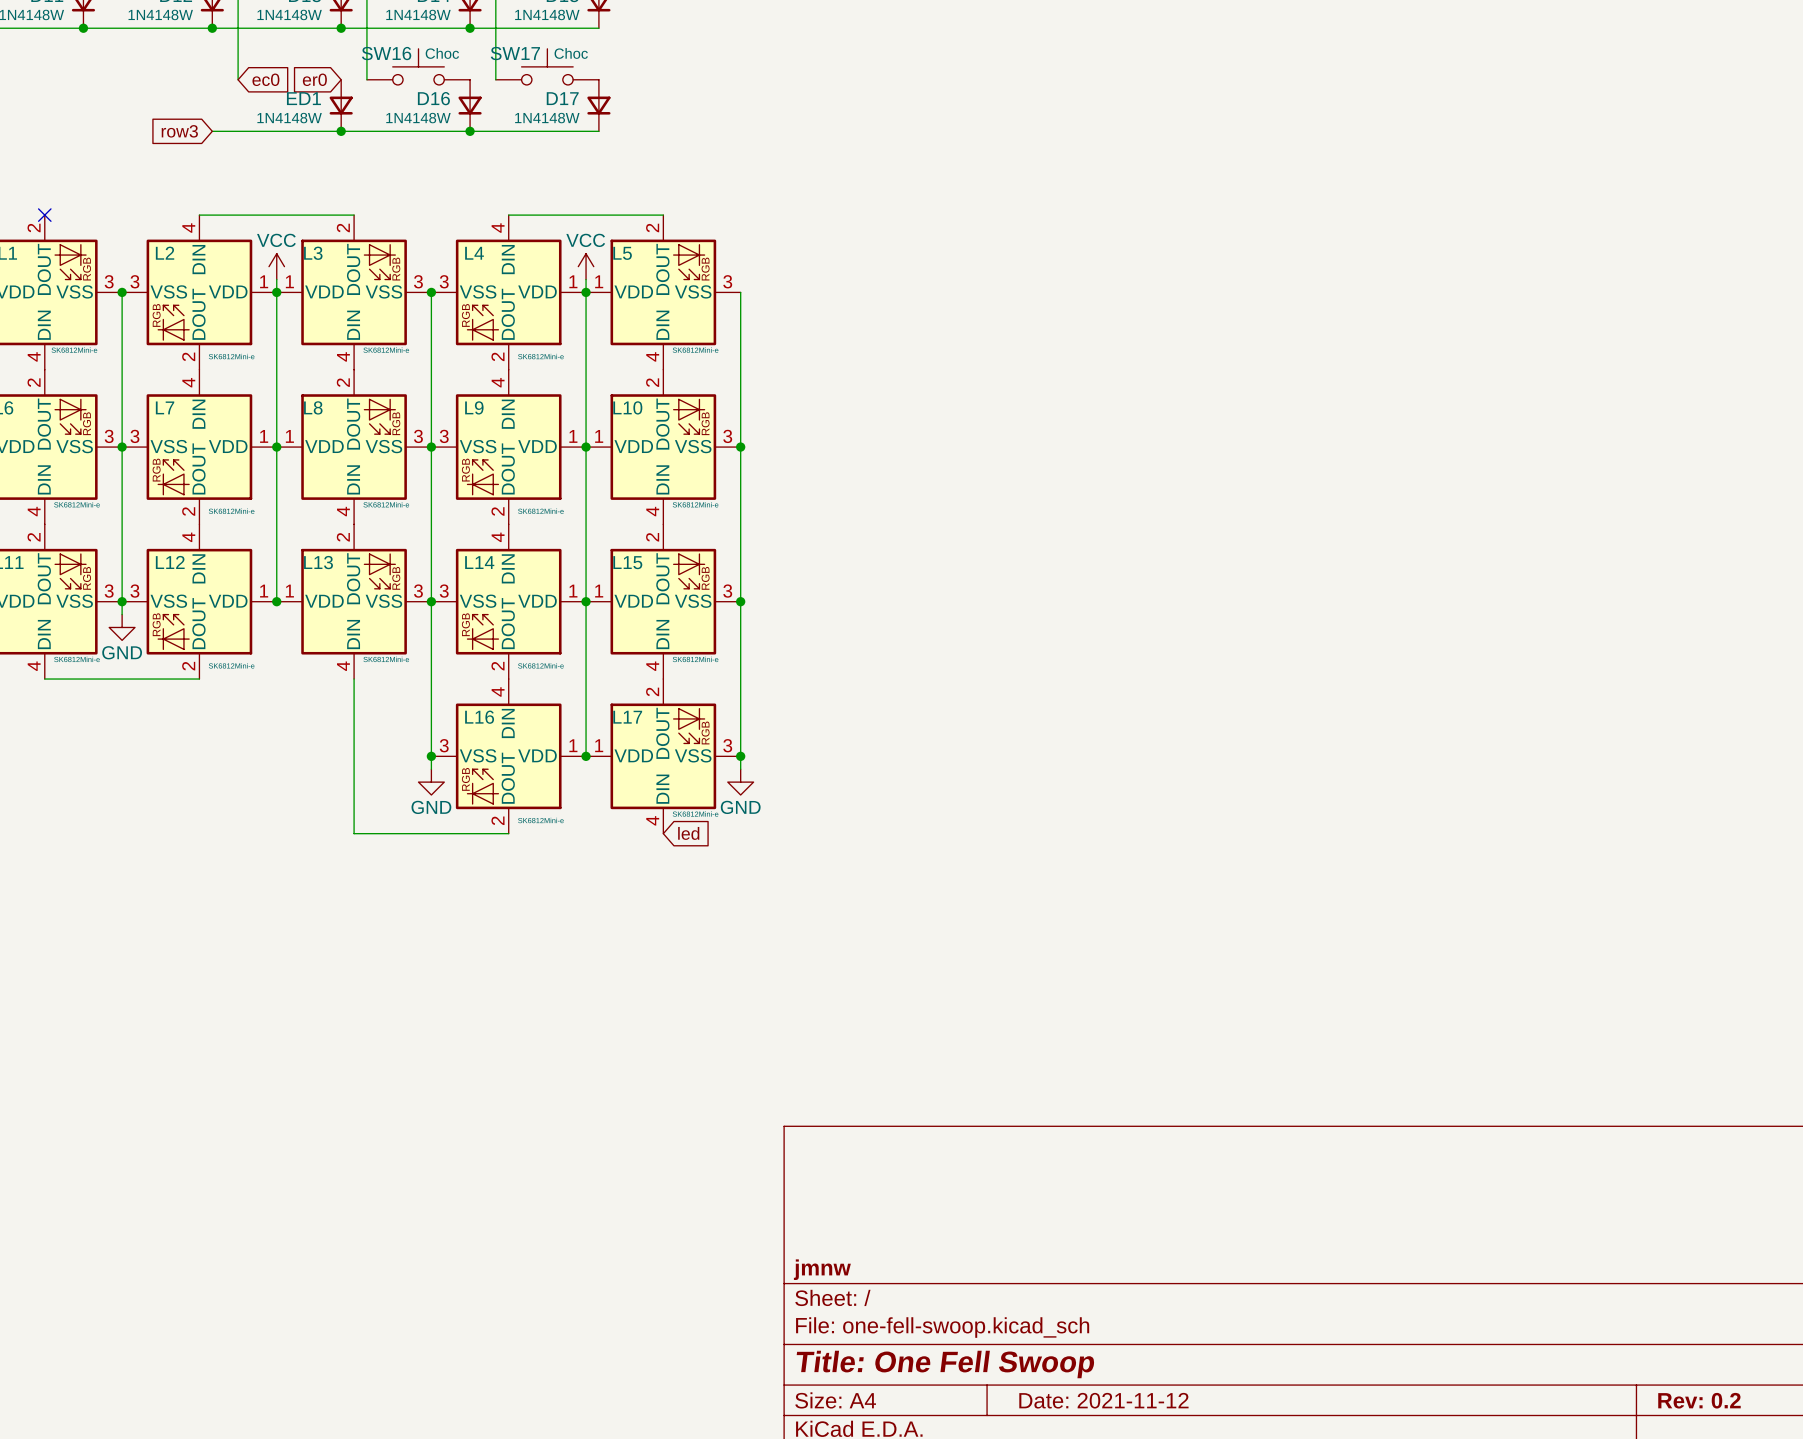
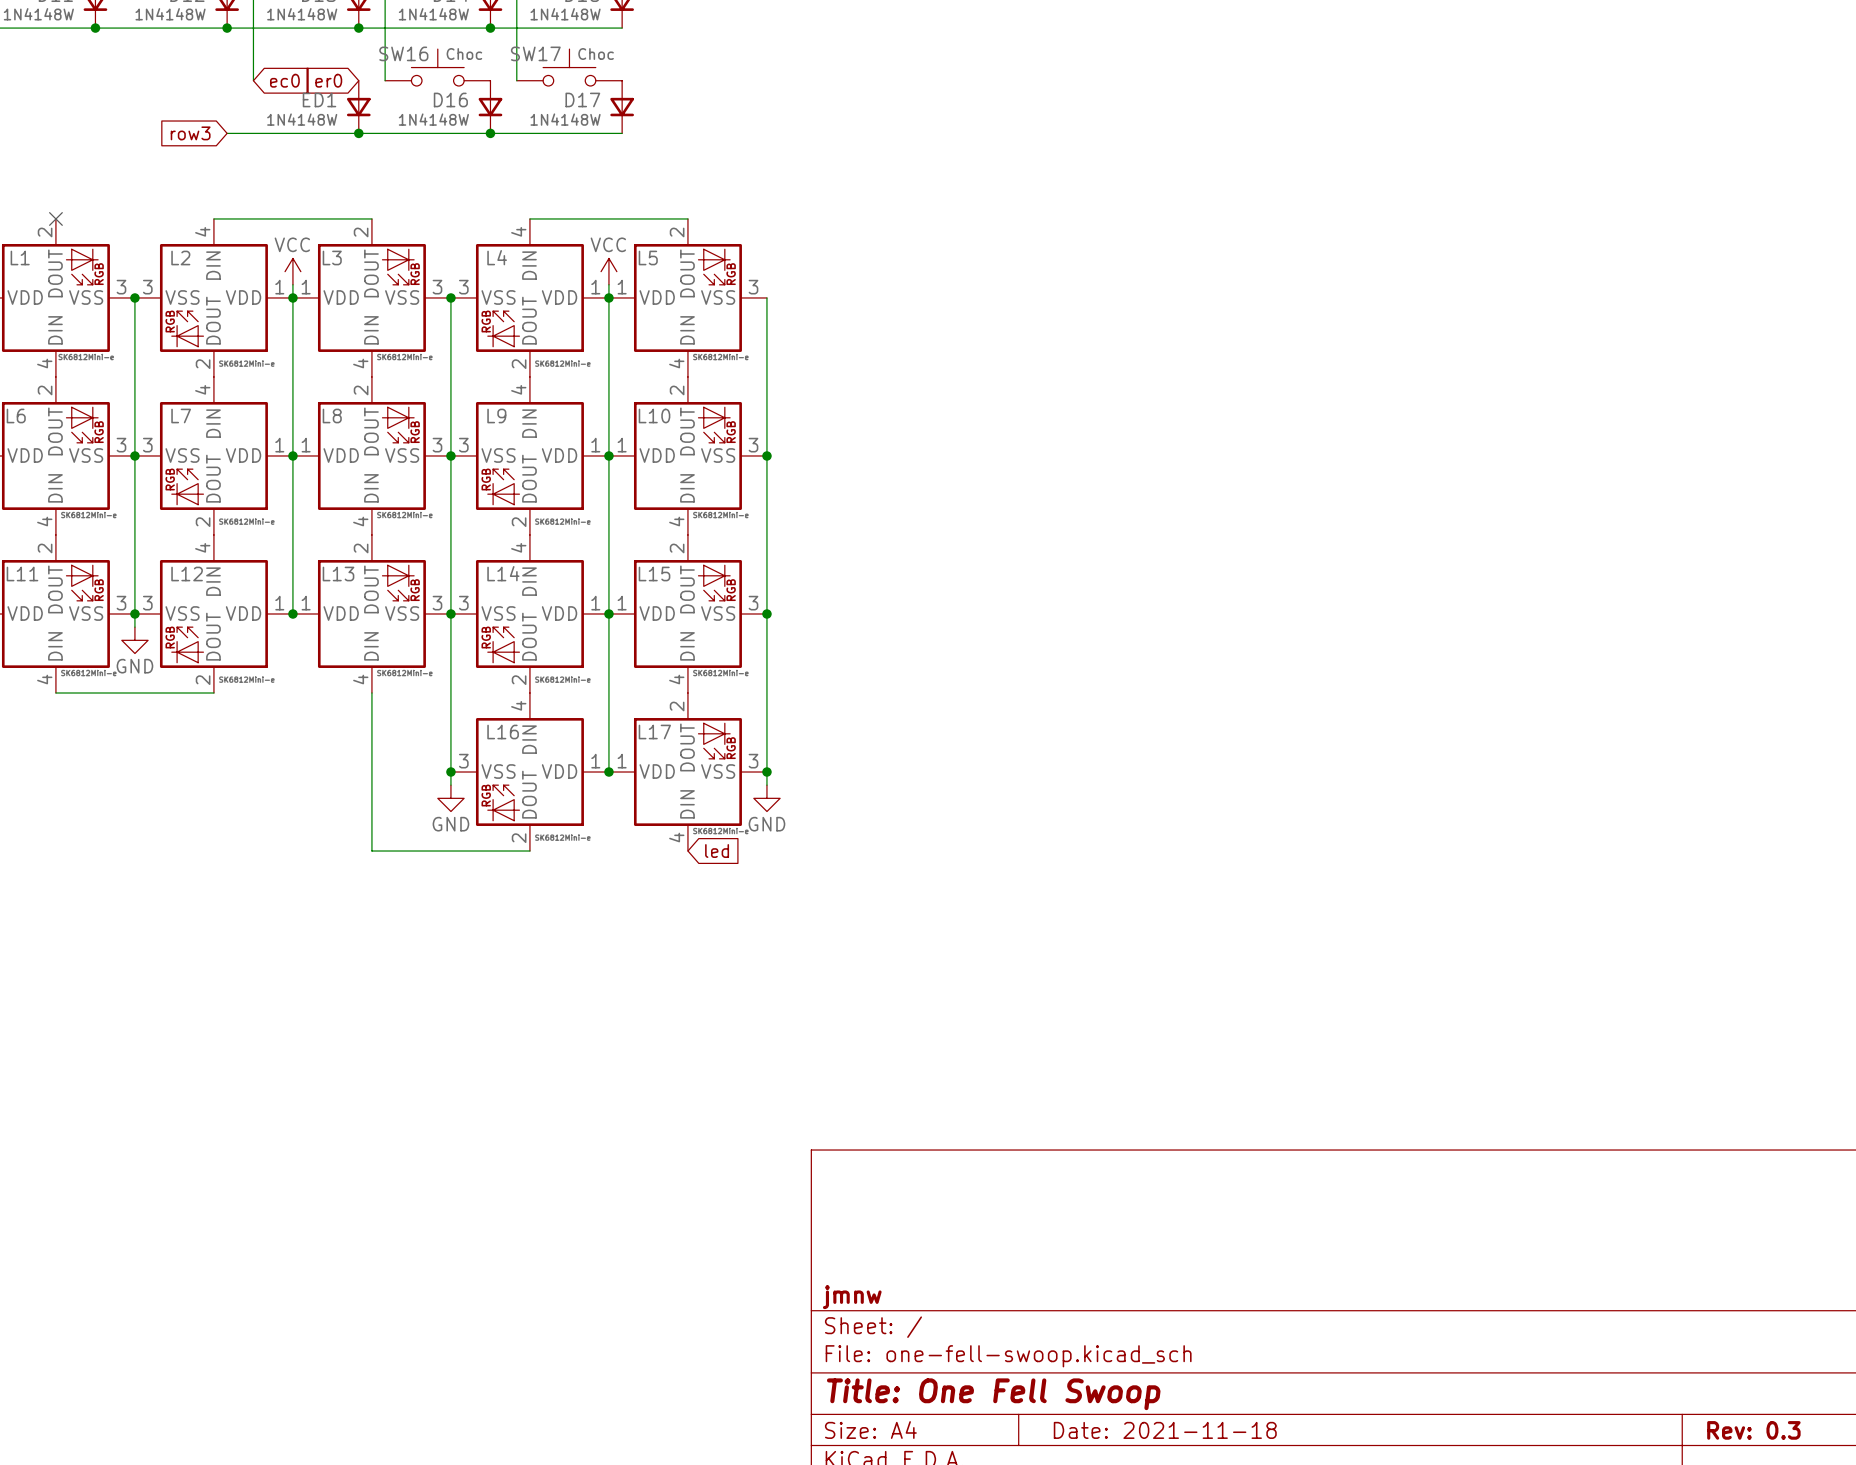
title block: Date: 2021-11-12 (1103, 1400) -> Date: 2021-11-18 (1165, 1430)
title block: Rev: 0.2 (1699, 1400) -> Rev: 0.3 (1753, 1430)

